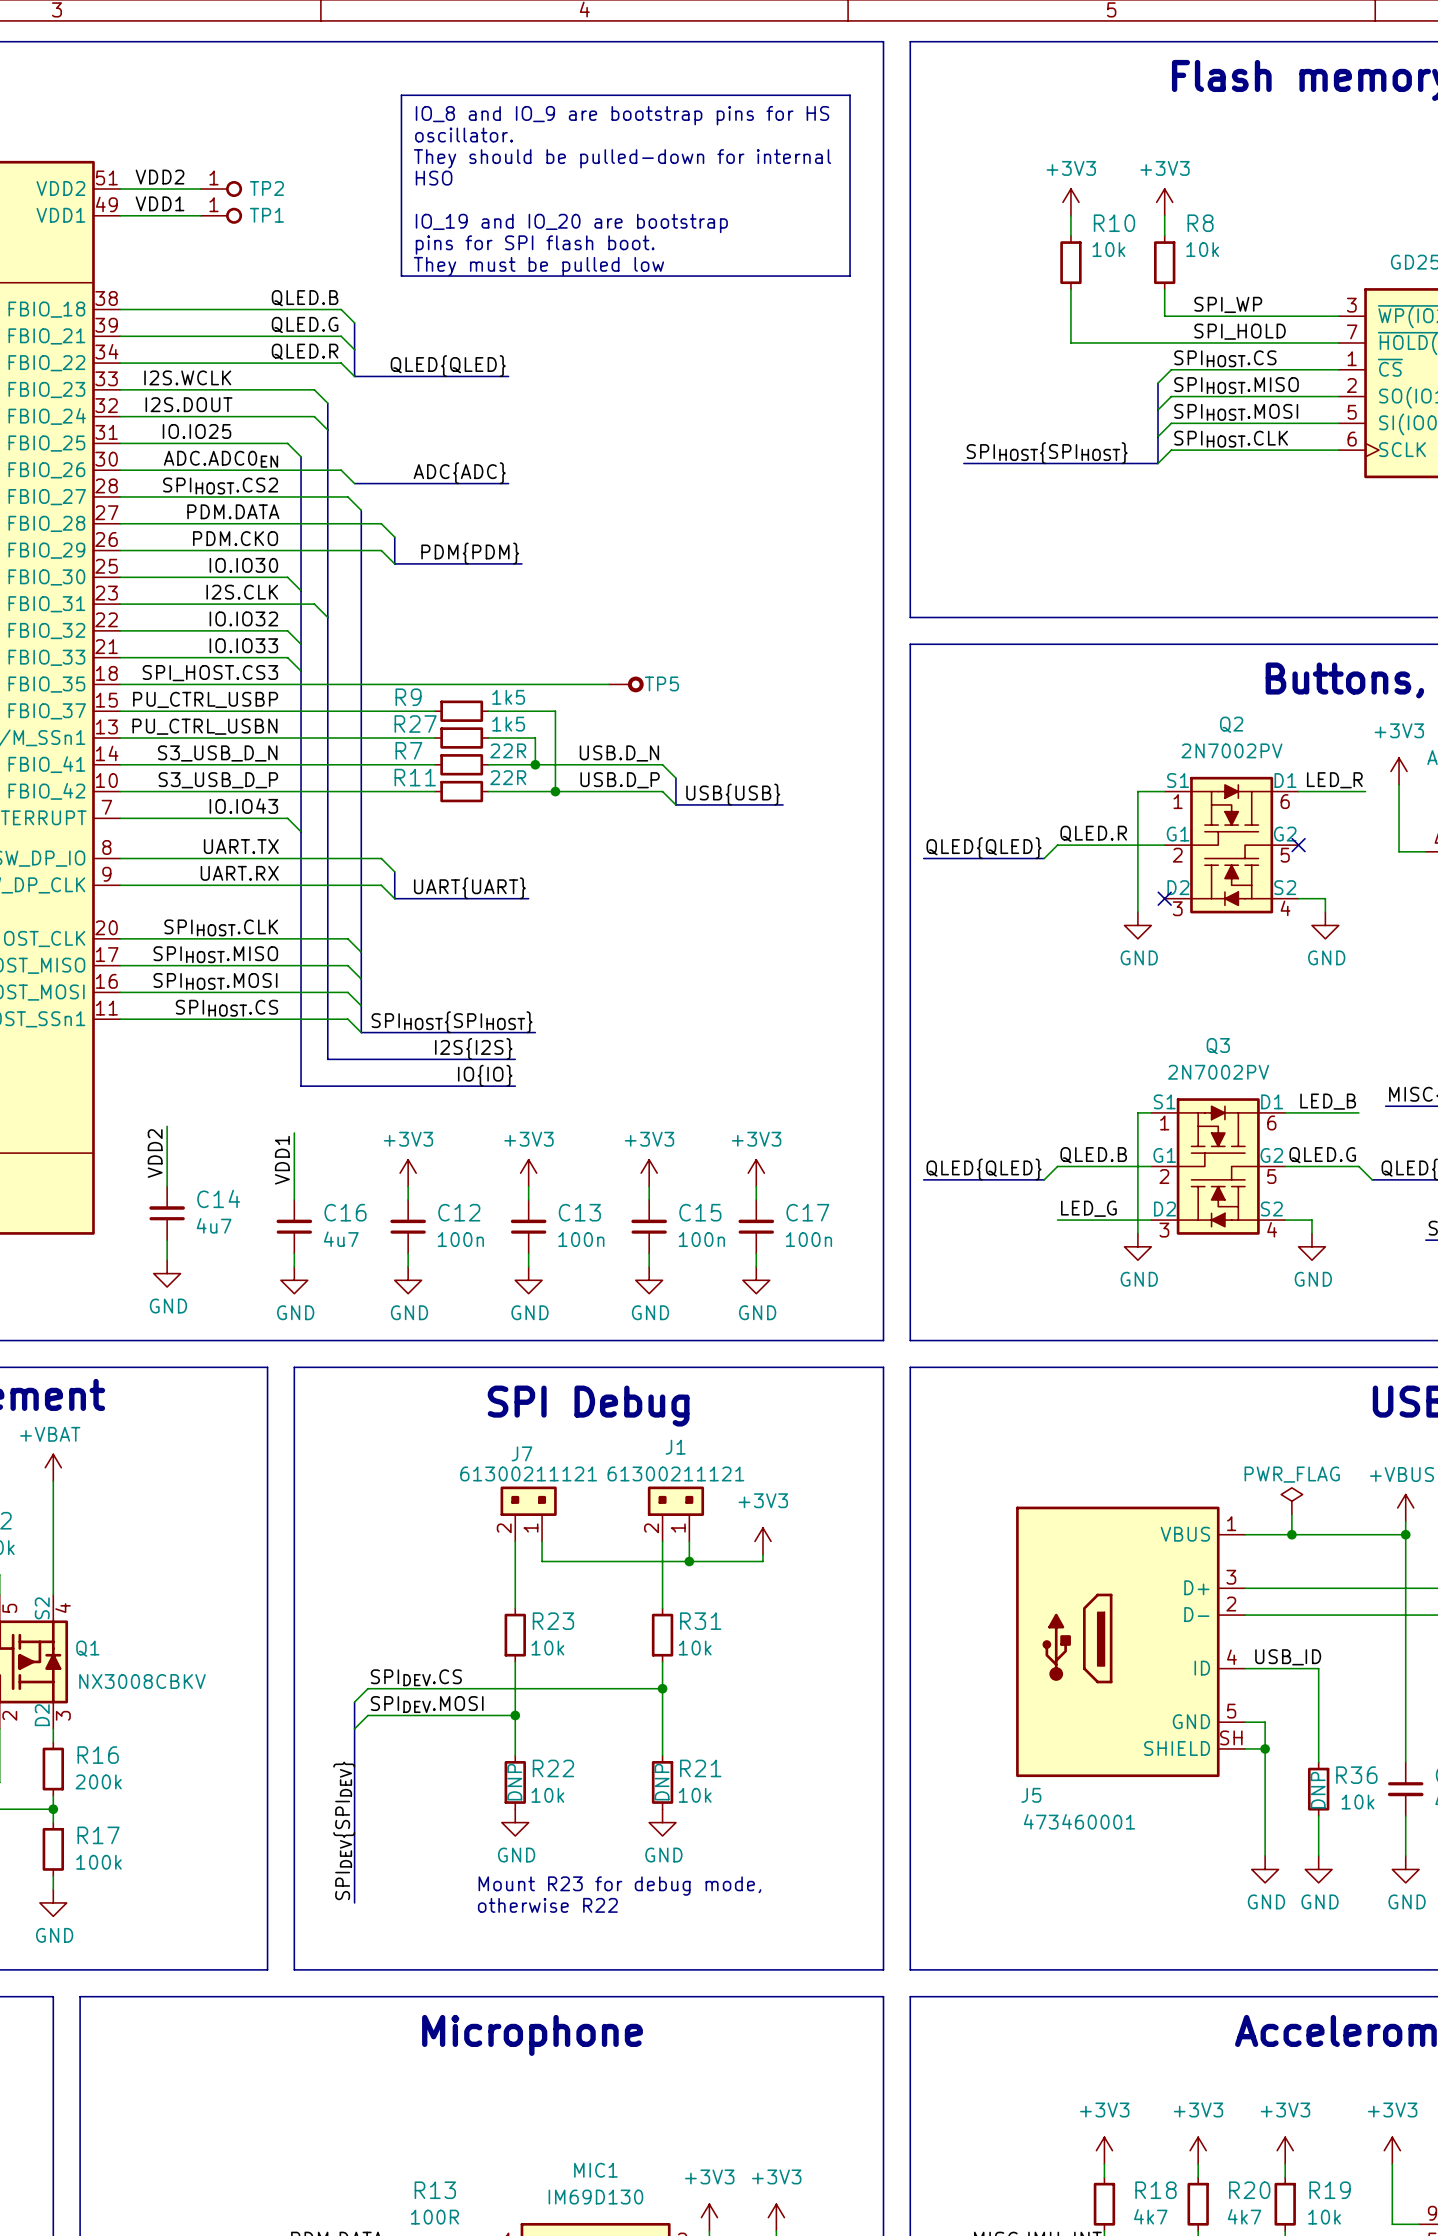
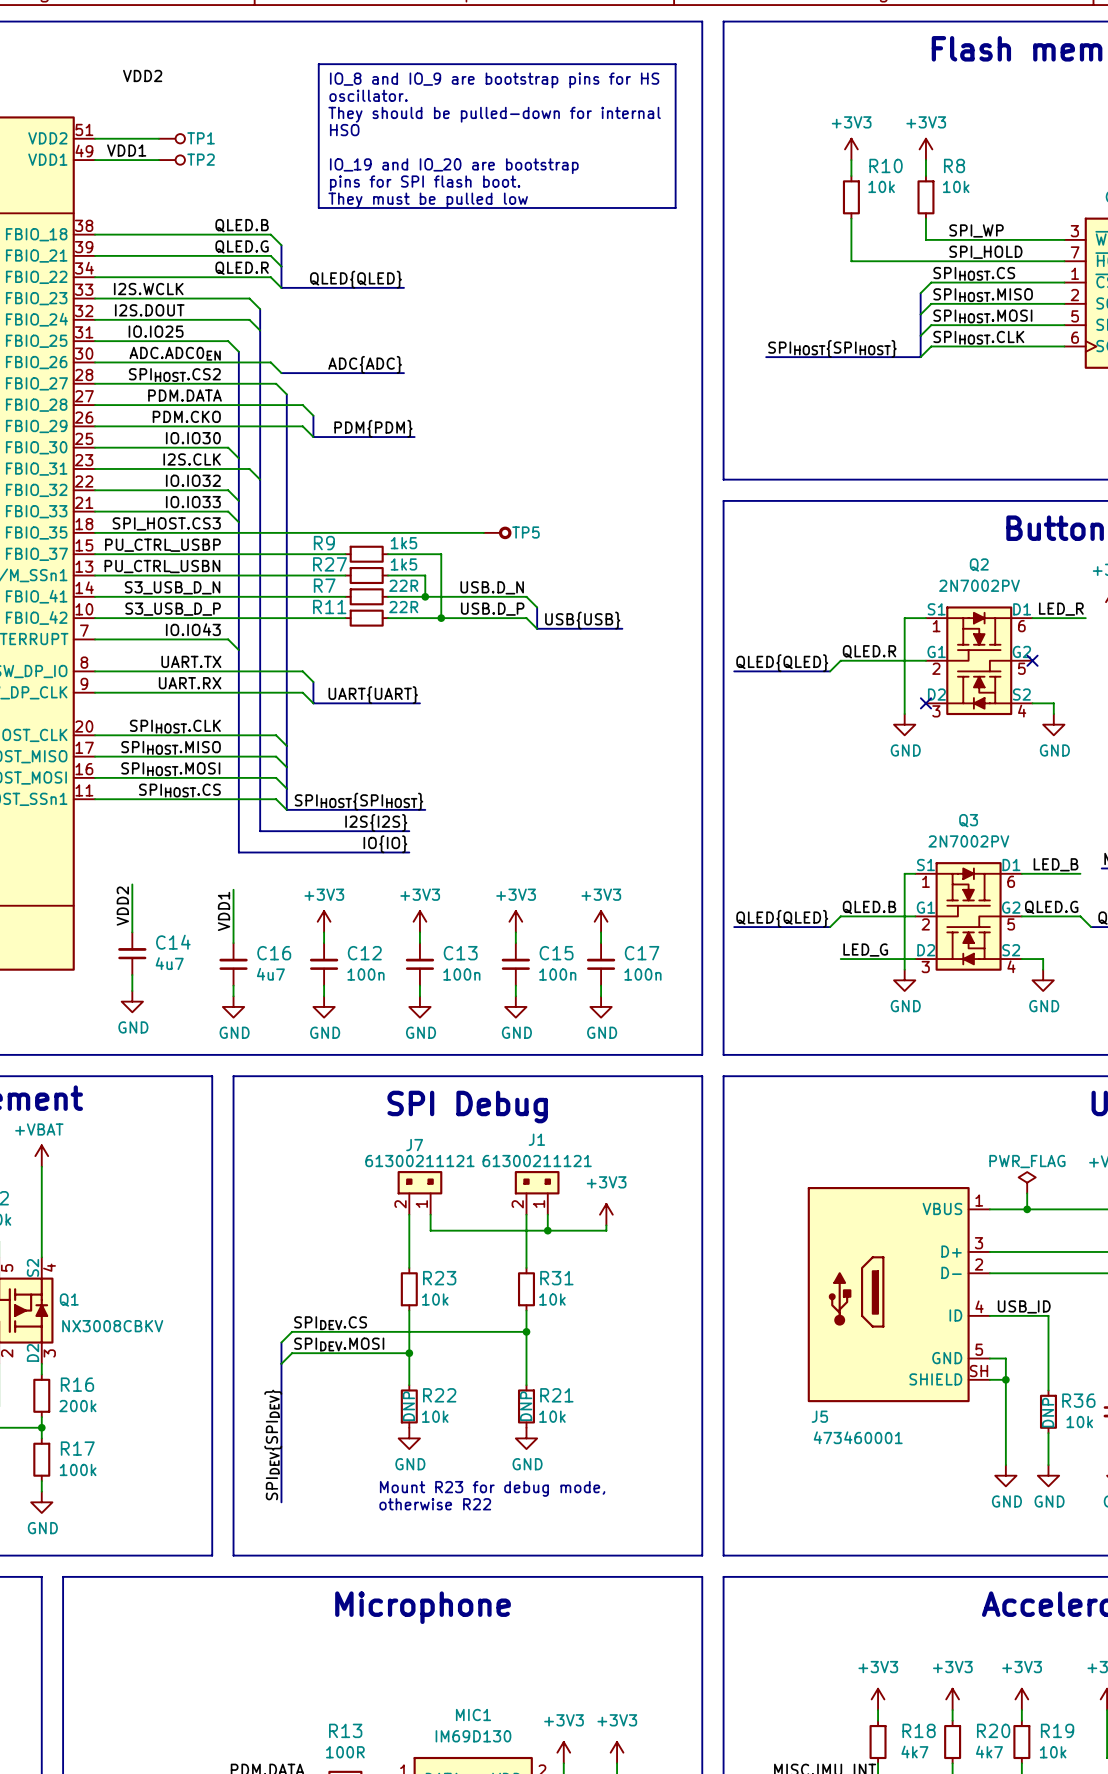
label position: VDD2 (160, 177) -> VDD2 (142, 75)
TP2 symbol: [200, 180, 243, 198] -> [158, 155, 185, 165]
TP1 symbol: [200, 207, 243, 224] -> [158, 134, 185, 144]

